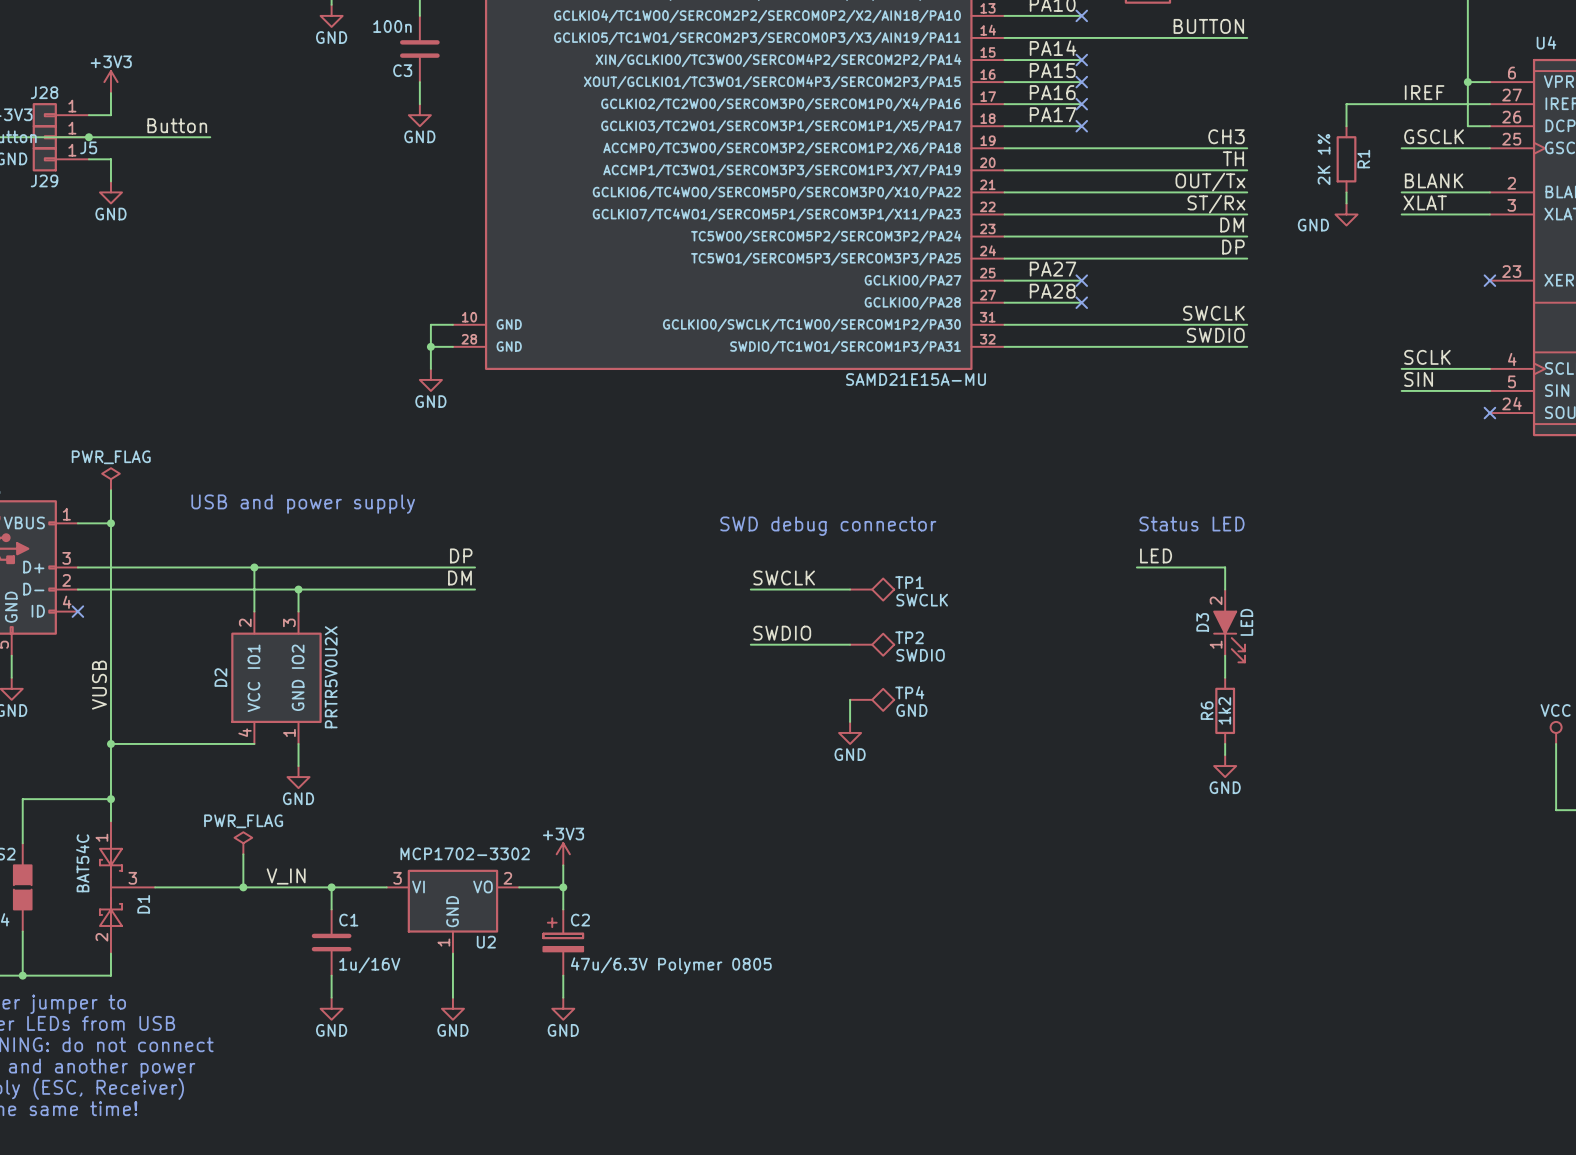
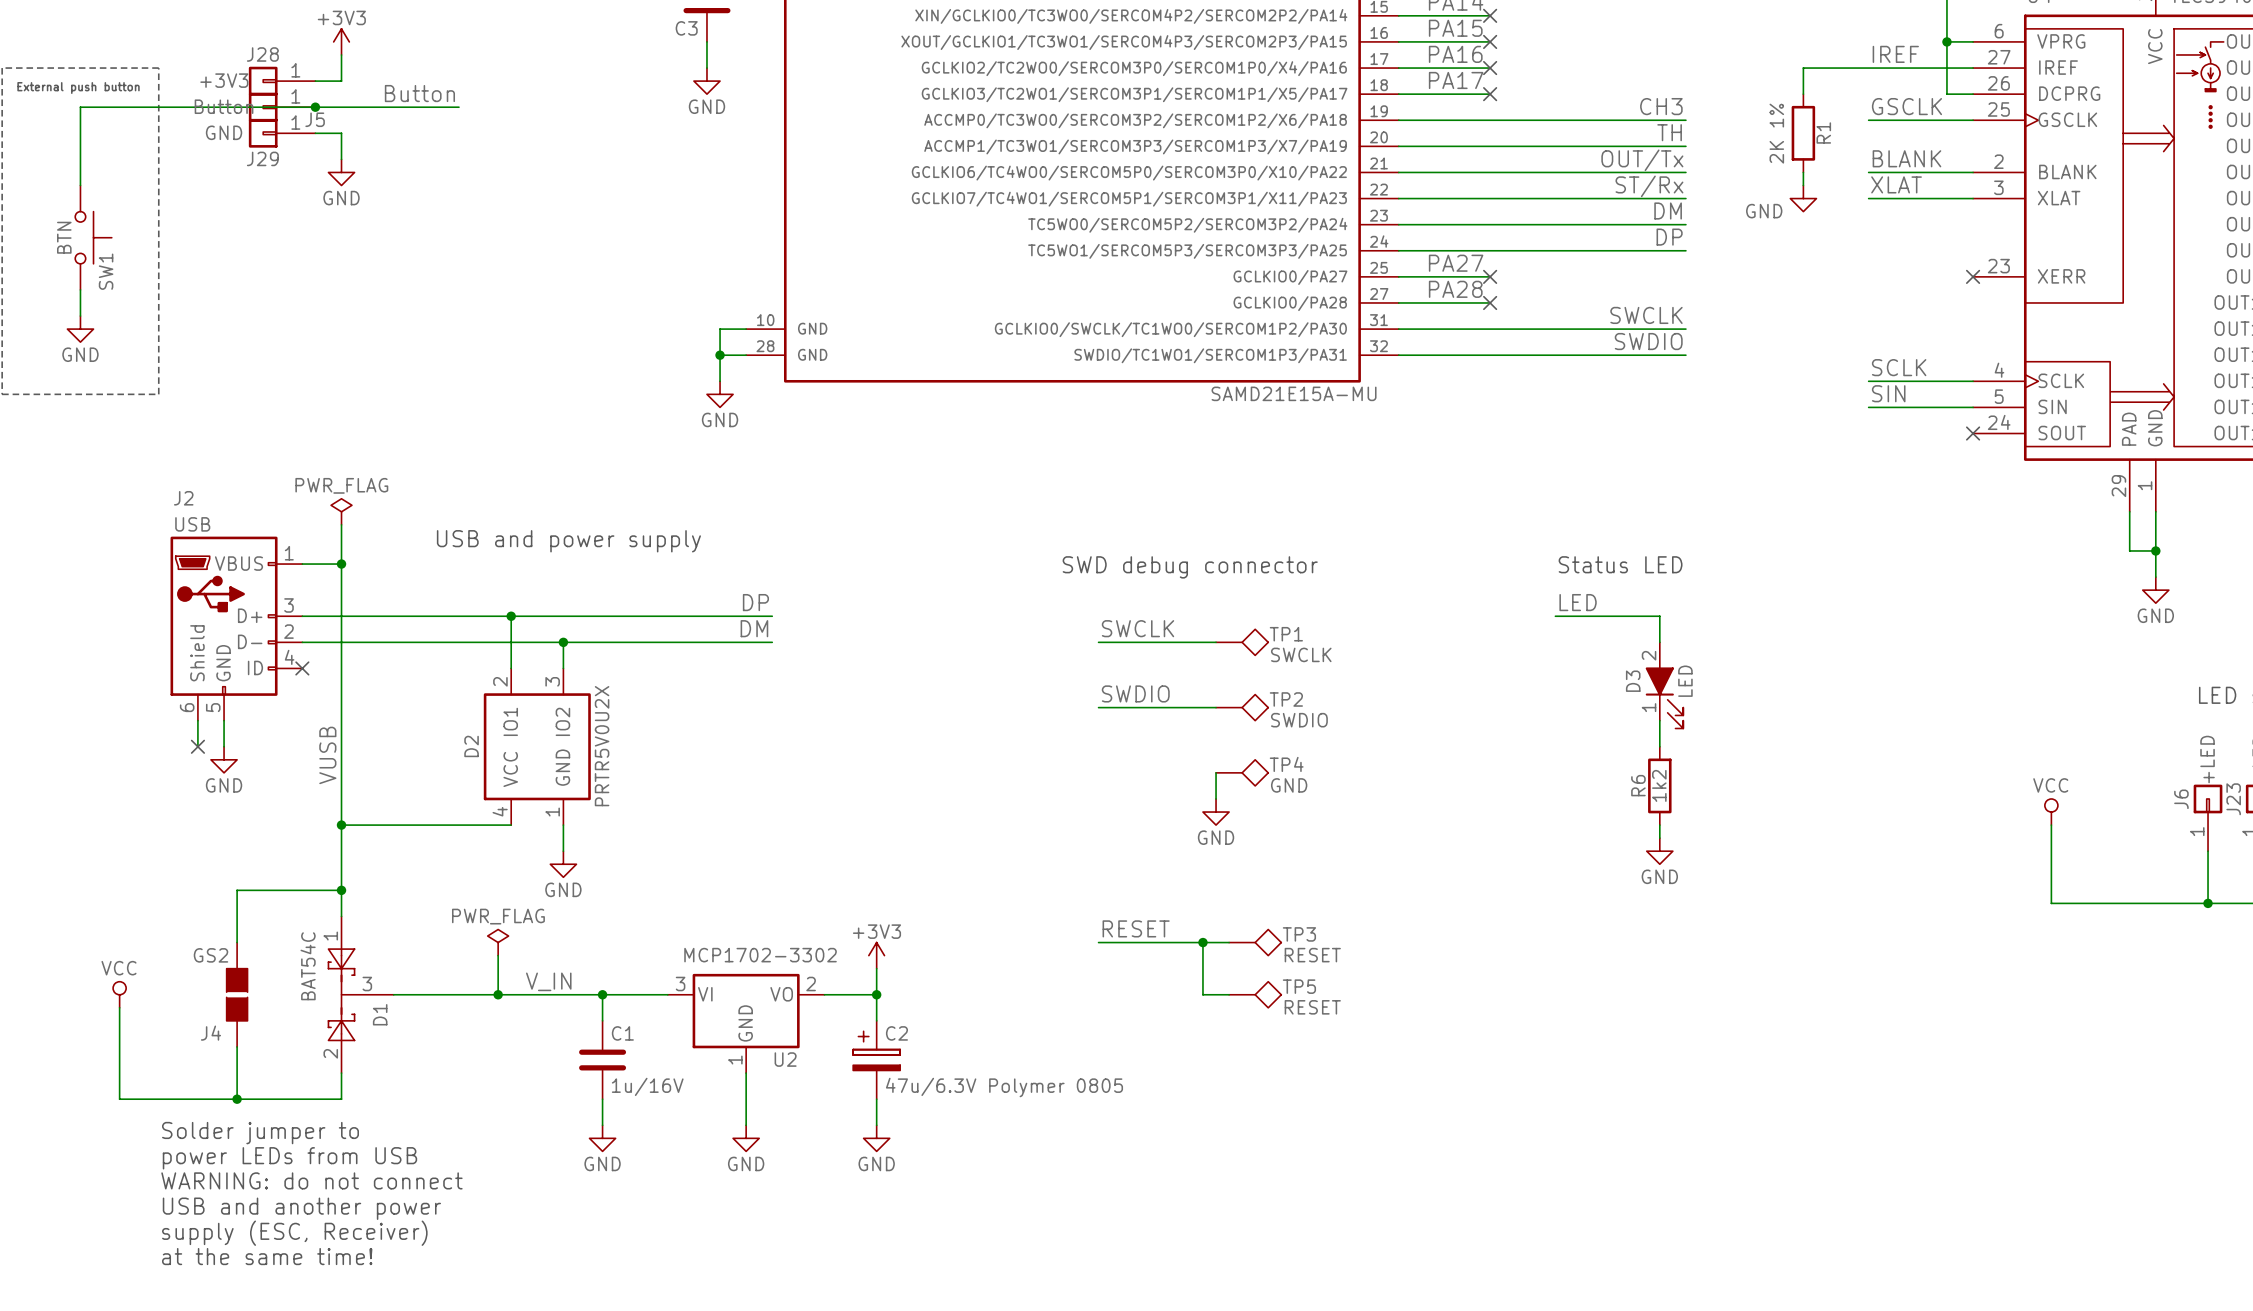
label: none -> RESET (1136, 928)
wire: none -> (1098, 942) (1229, 942)
wire: none -> (1202, 942) (1202, 994) (1229, 994)
junction: none -> (1202, 942)
TP3: none -> RESET (1255, 942)
TP5: none -> RESET (1255, 994)

